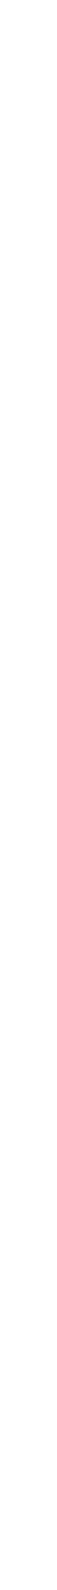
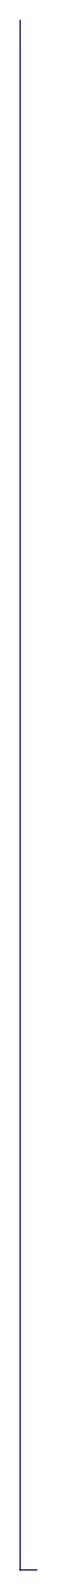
bus: none -> (20, 20) (20, 1569) (36, 1569)

